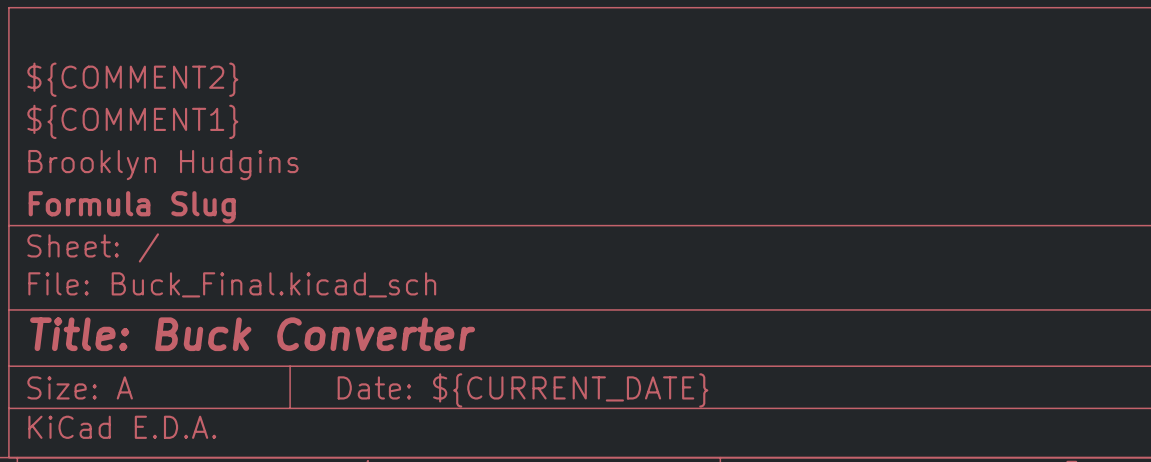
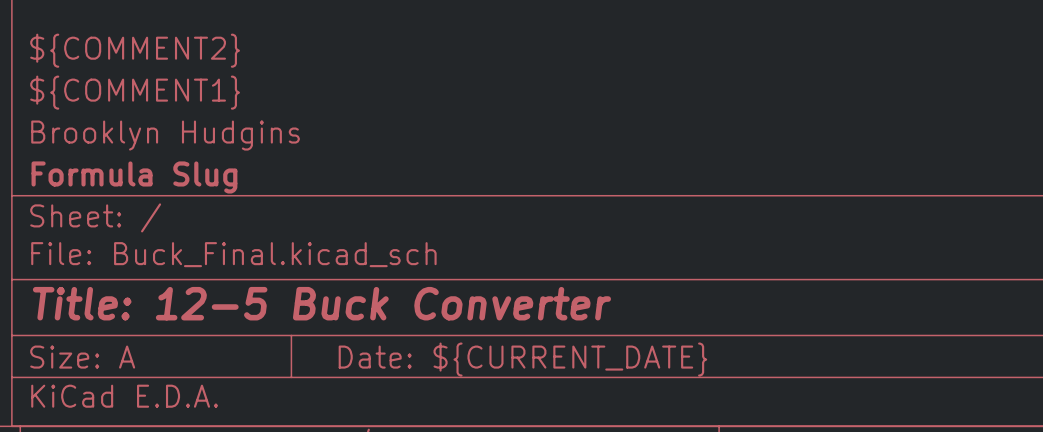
title block: Title: Buck Converter (252, 334) -> Title: 12-5 Buck Converter (321, 303)

